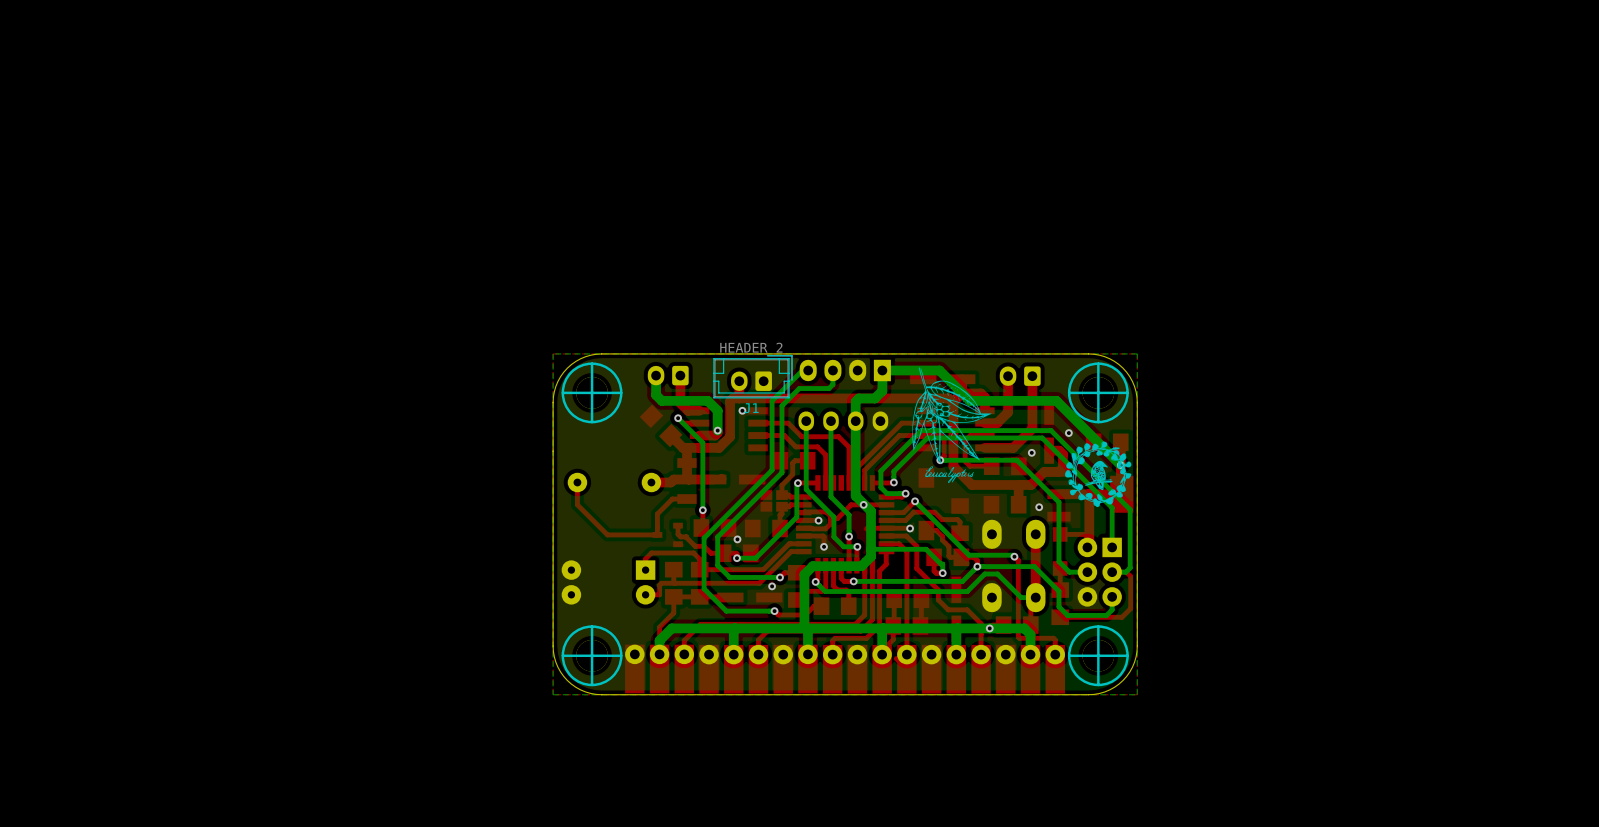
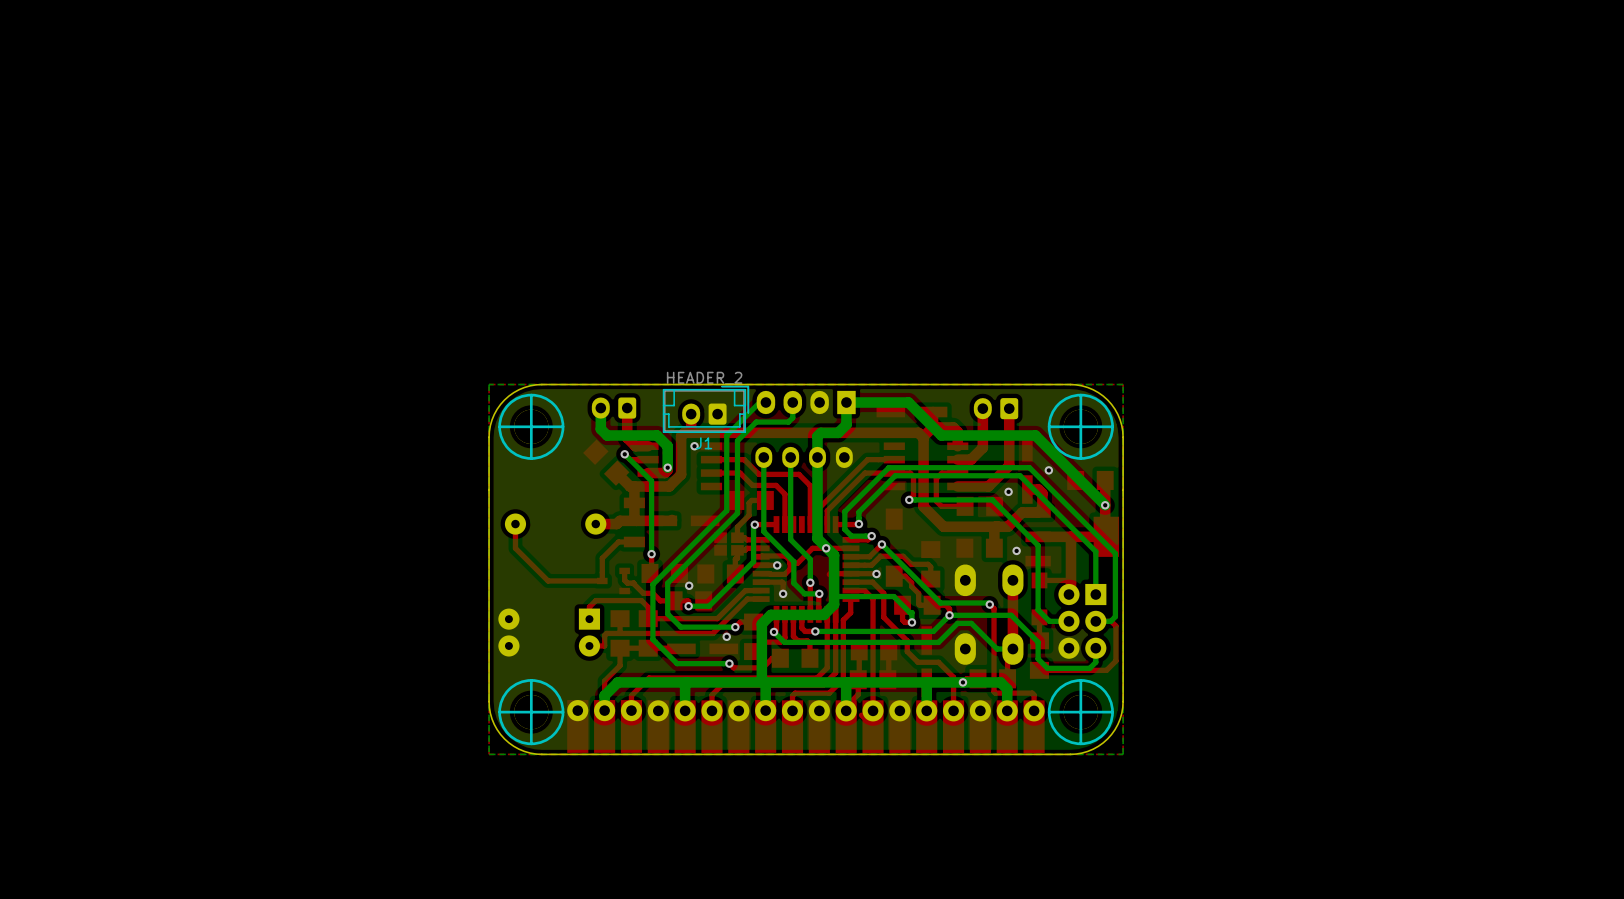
drawing: [912, 367, 992, 483] -> none
drawing: [1065, 441, 1132, 508] -> none

